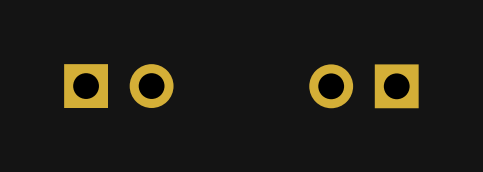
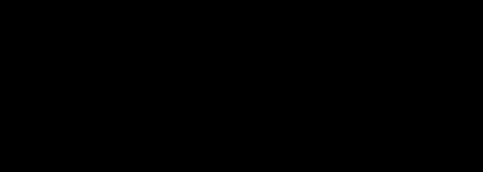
part: (118, 86) -> none
part: (363, 86) -> none

